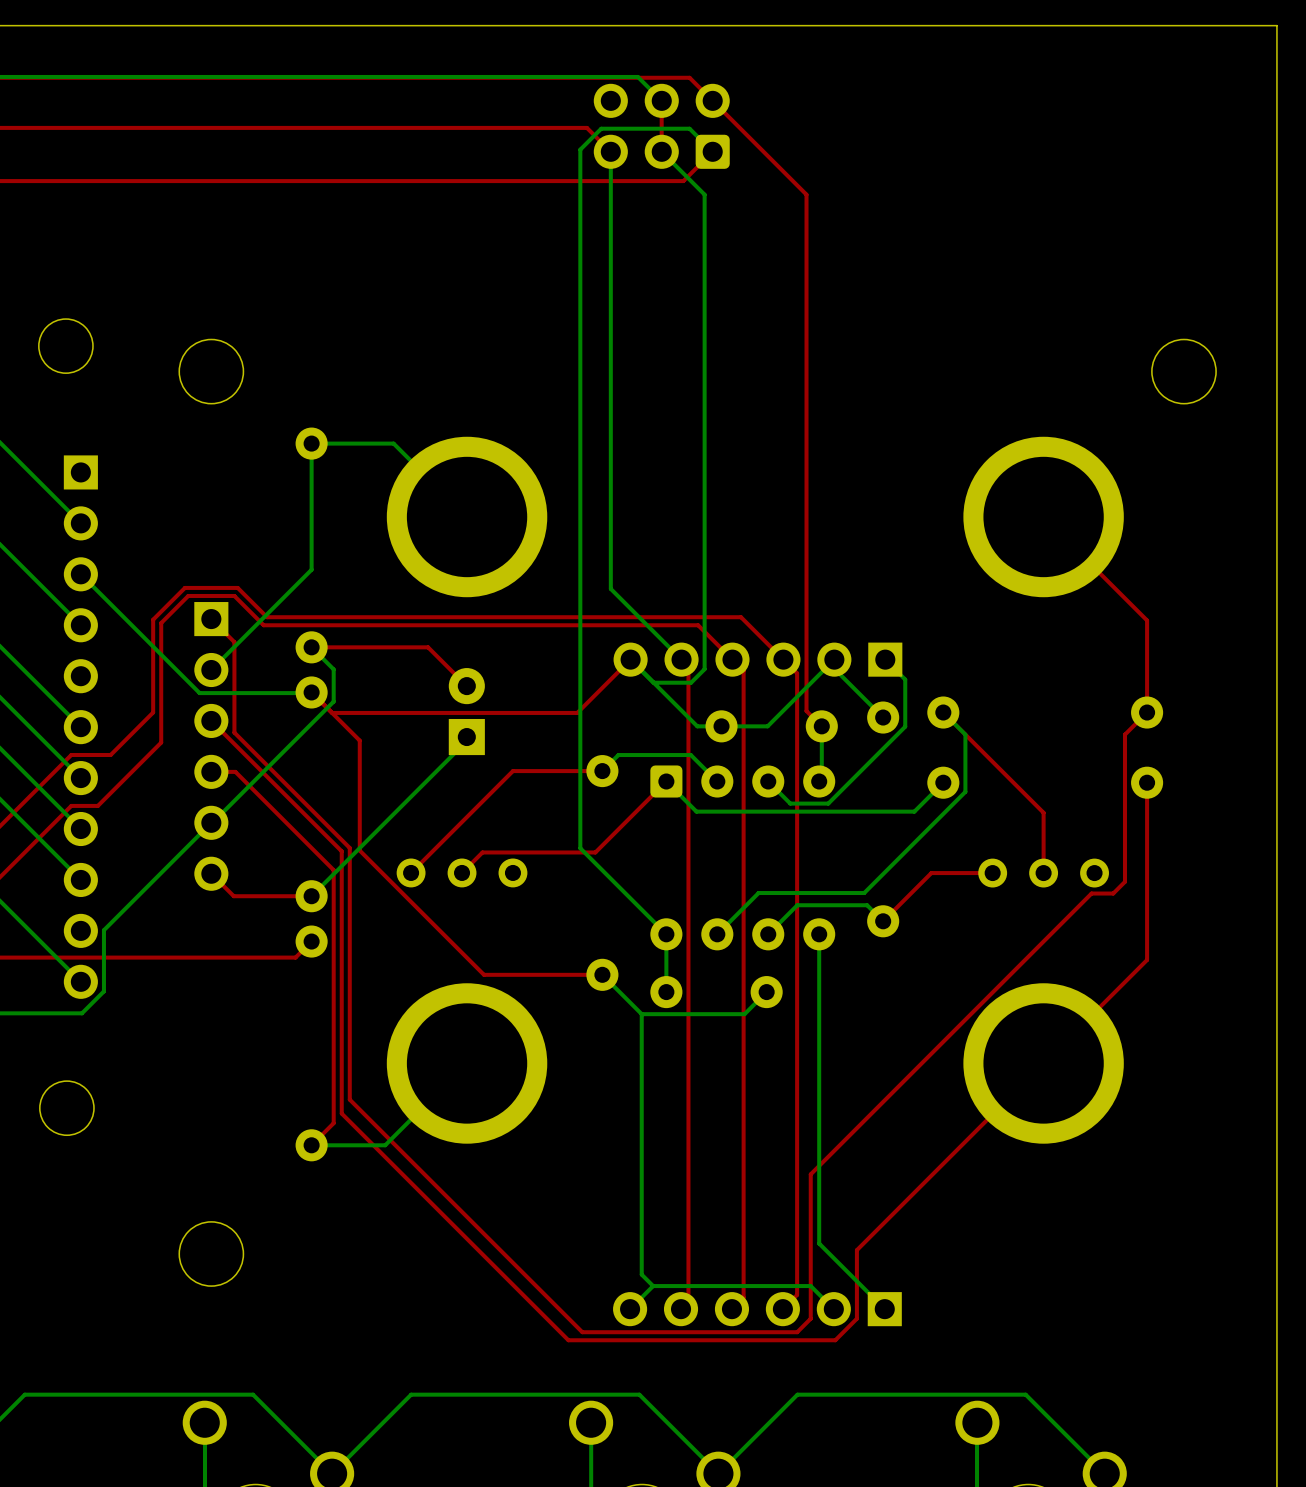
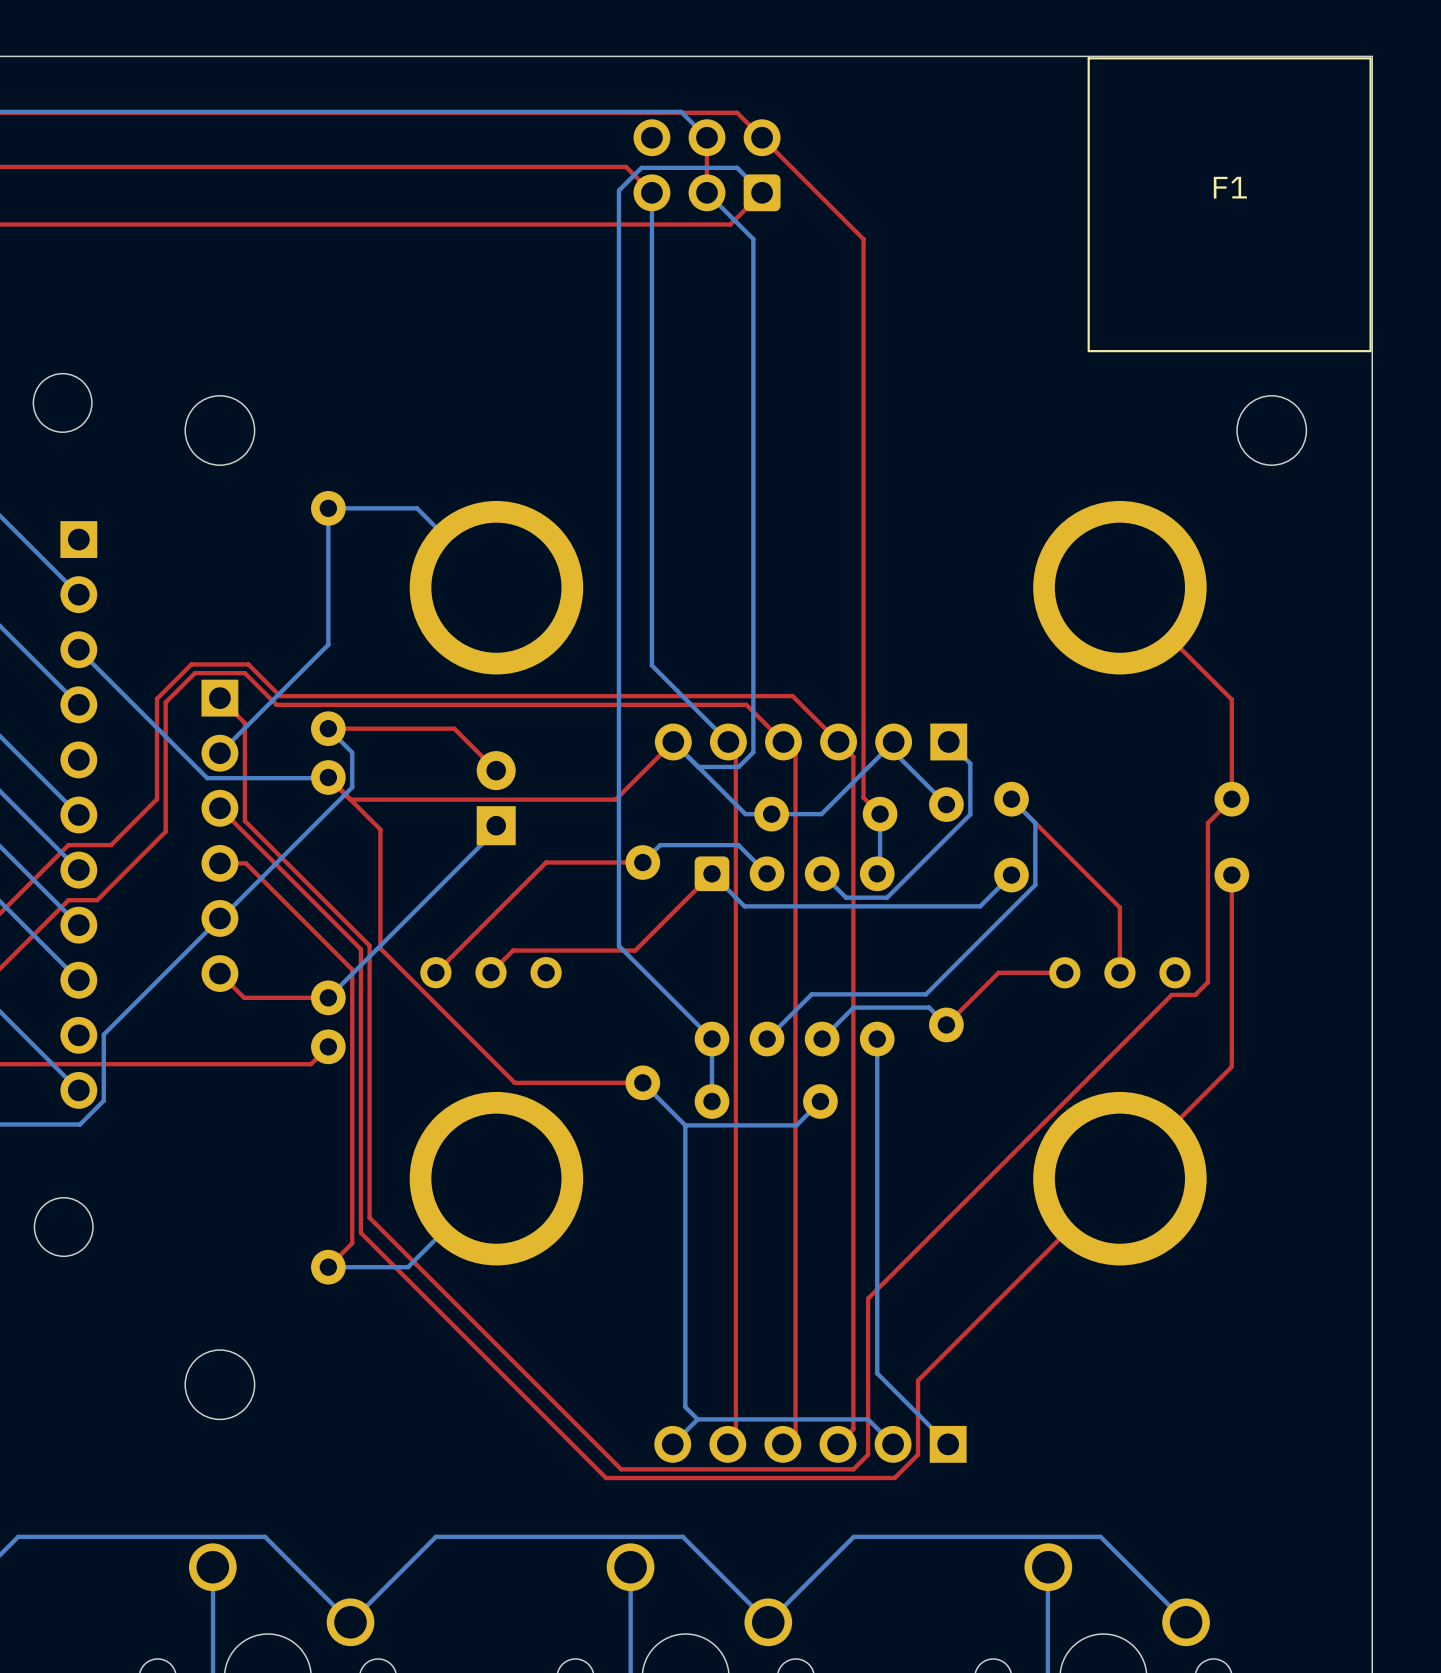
F1: none -> (1229, 204)

